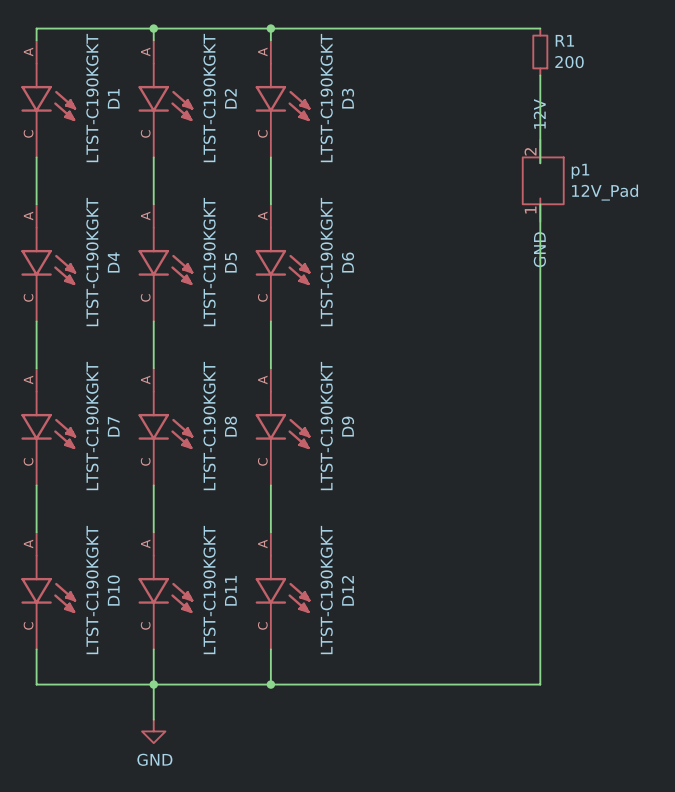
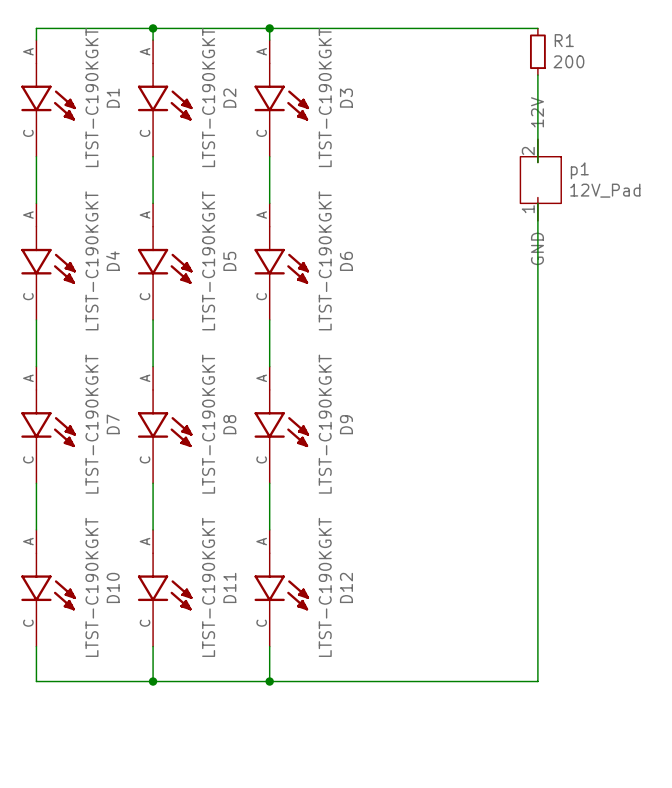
wire: (153, 684) (153, 719) -> none
power symbol: GND (153, 731) -> none

